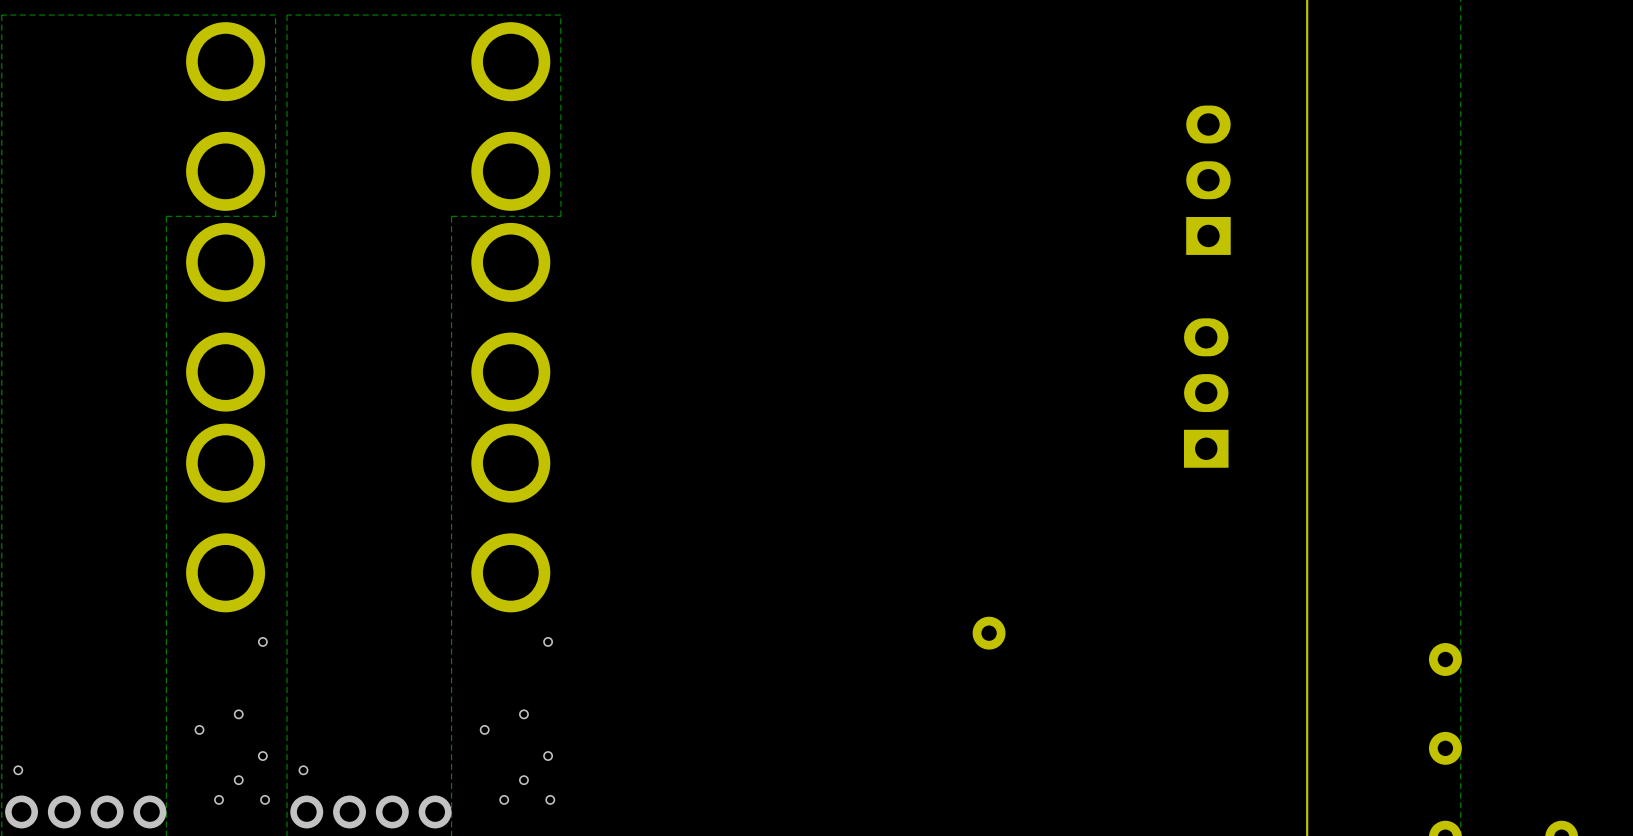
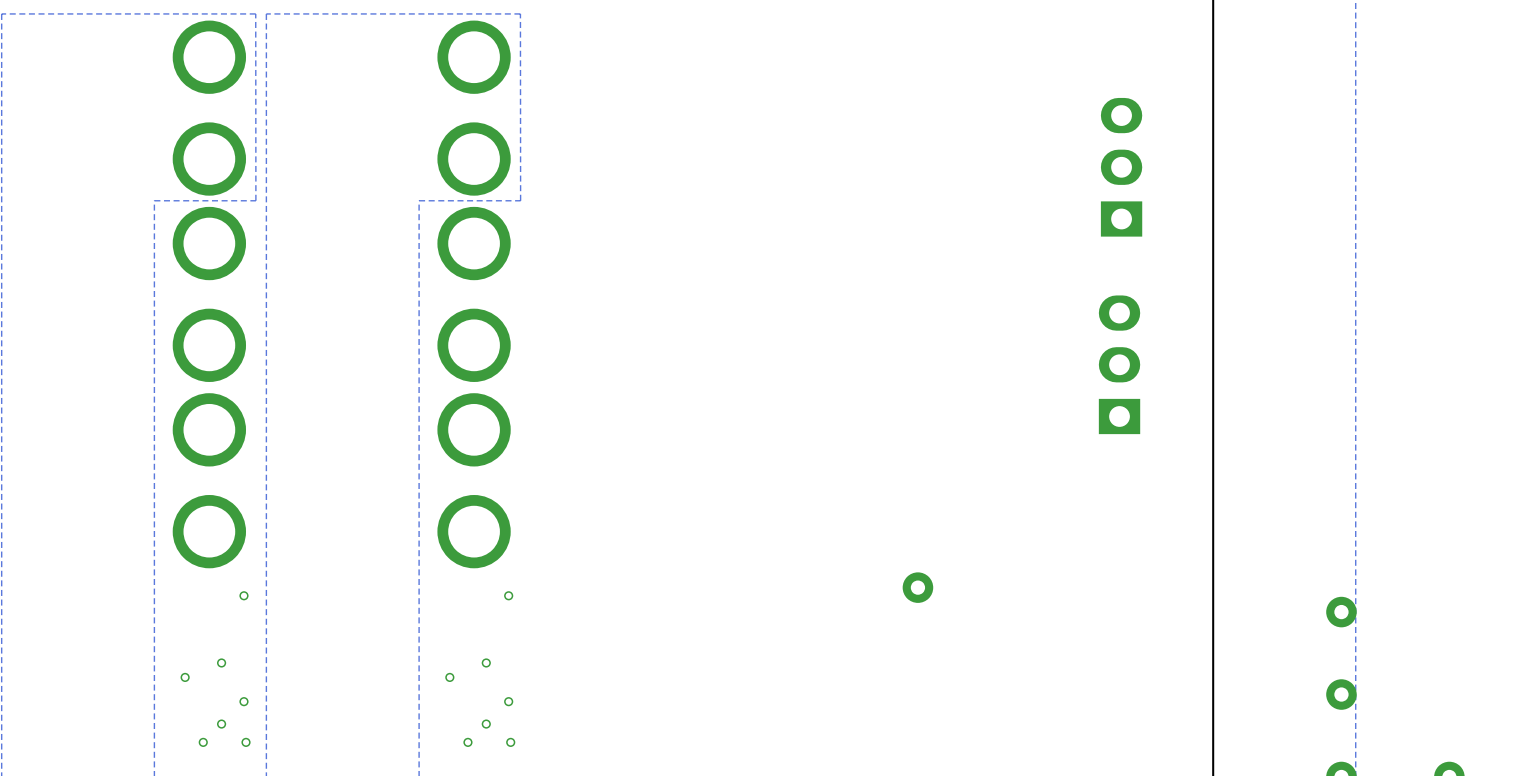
via: (18, 770) -> none
via: (303, 770) -> none
via: (21, 811) -> none
via: (64, 811) -> none
via: (107, 811) -> none
via: (149, 811) -> none
via: (306, 811) -> none
via: (349, 811) -> none
via: (392, 811) -> none
via: (435, 811) -> none

